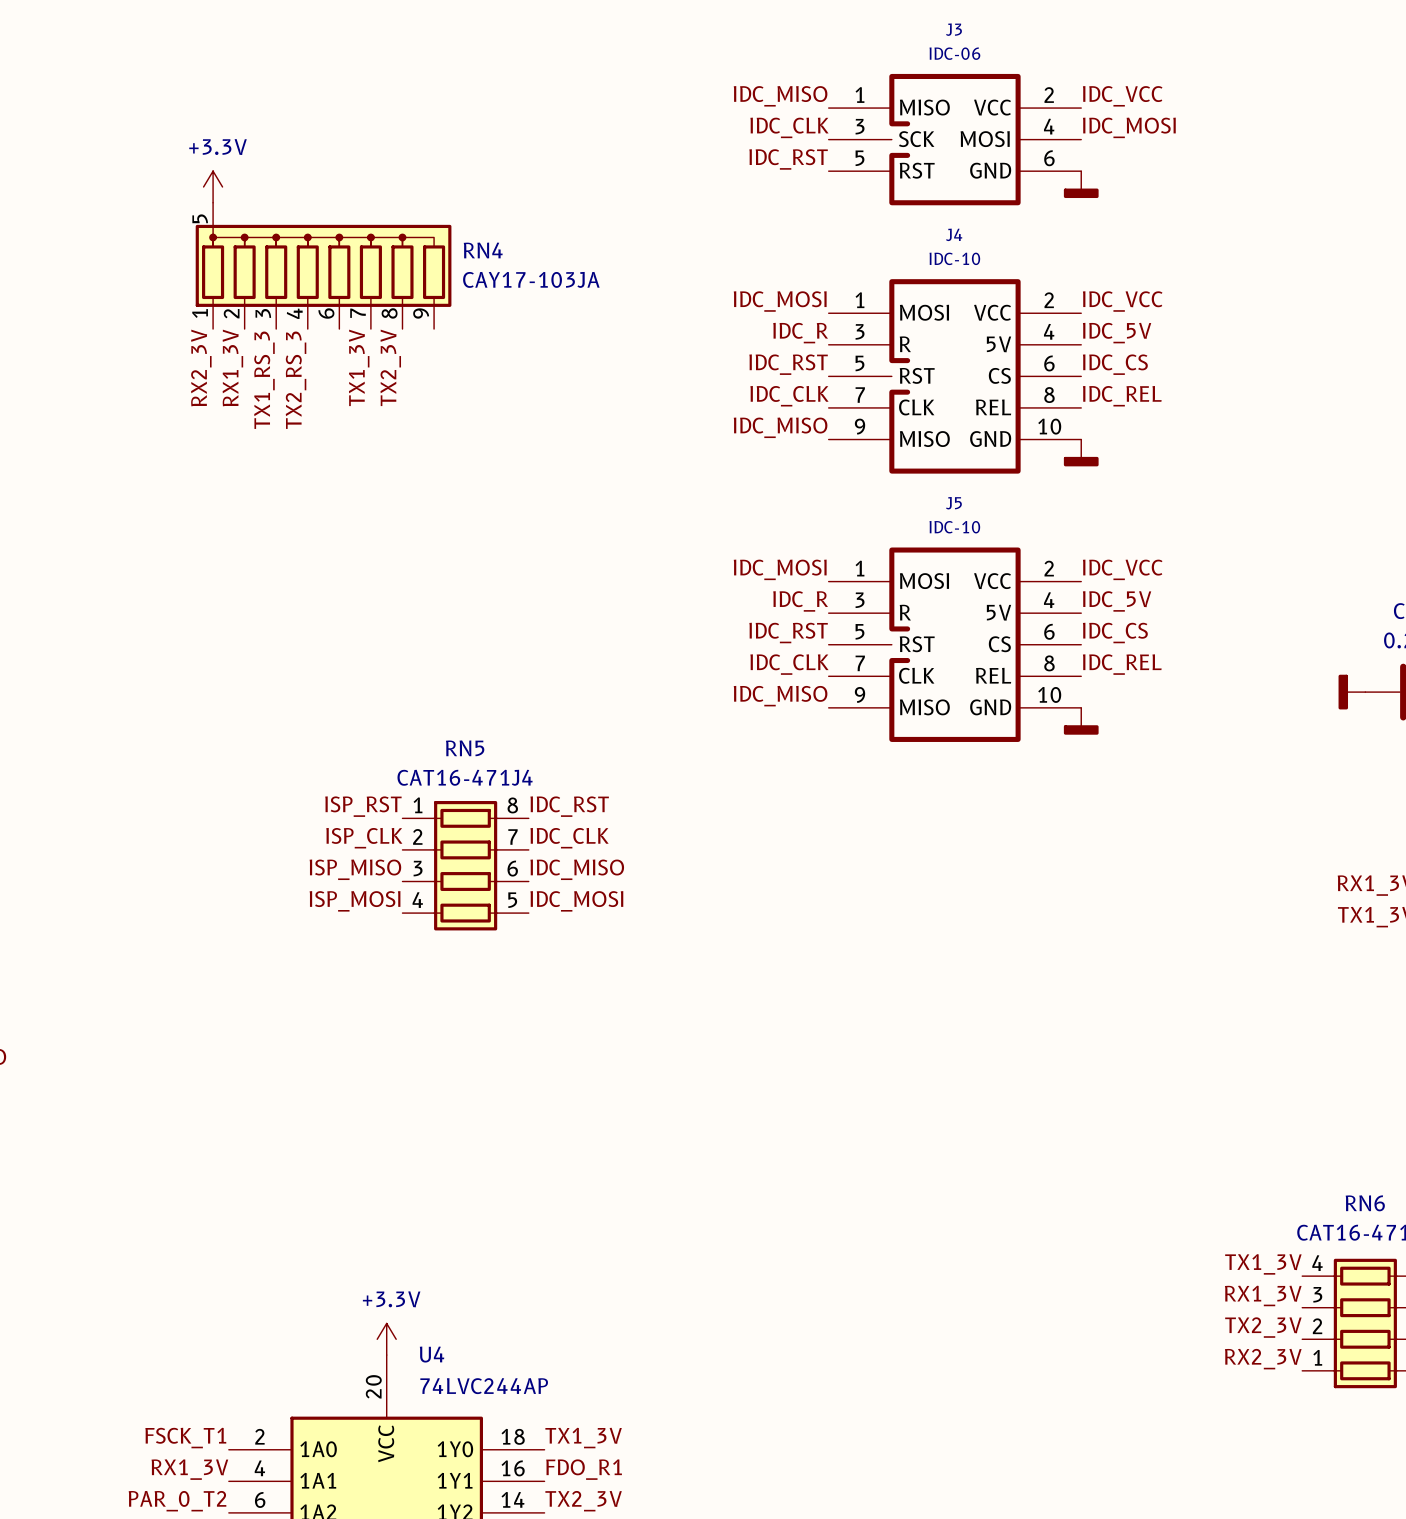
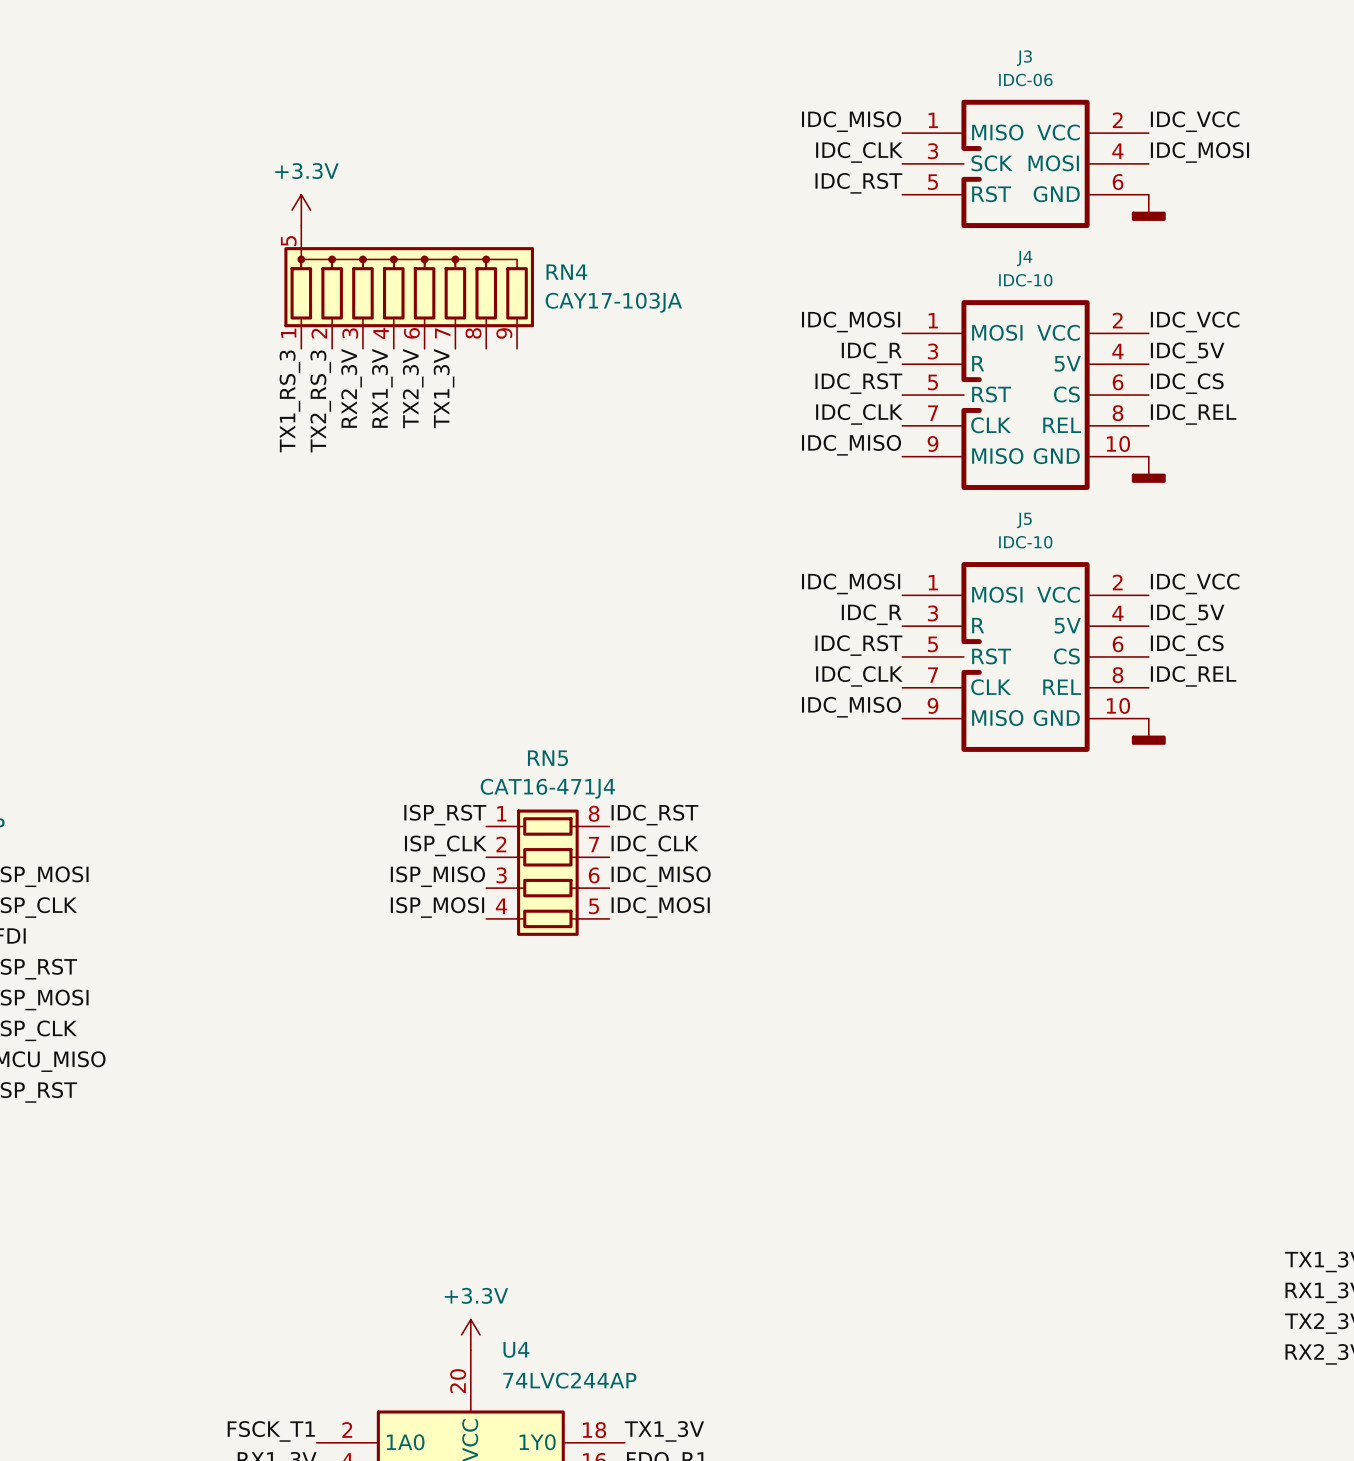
label position: TX2_3V (390, 367) -> TX2_3V (413, 388)
label: RX2_3V (201, 368) -> TX1_RS_3 (289, 401)
label: RX1_3V (232, 368) -> TX2_RS_3 (320, 401)
label: TX1_RS_3 (264, 380) -> RX2_3V (351, 388)
label: TX2_RS_3 (296, 380) -> RX1_3V (382, 388)

